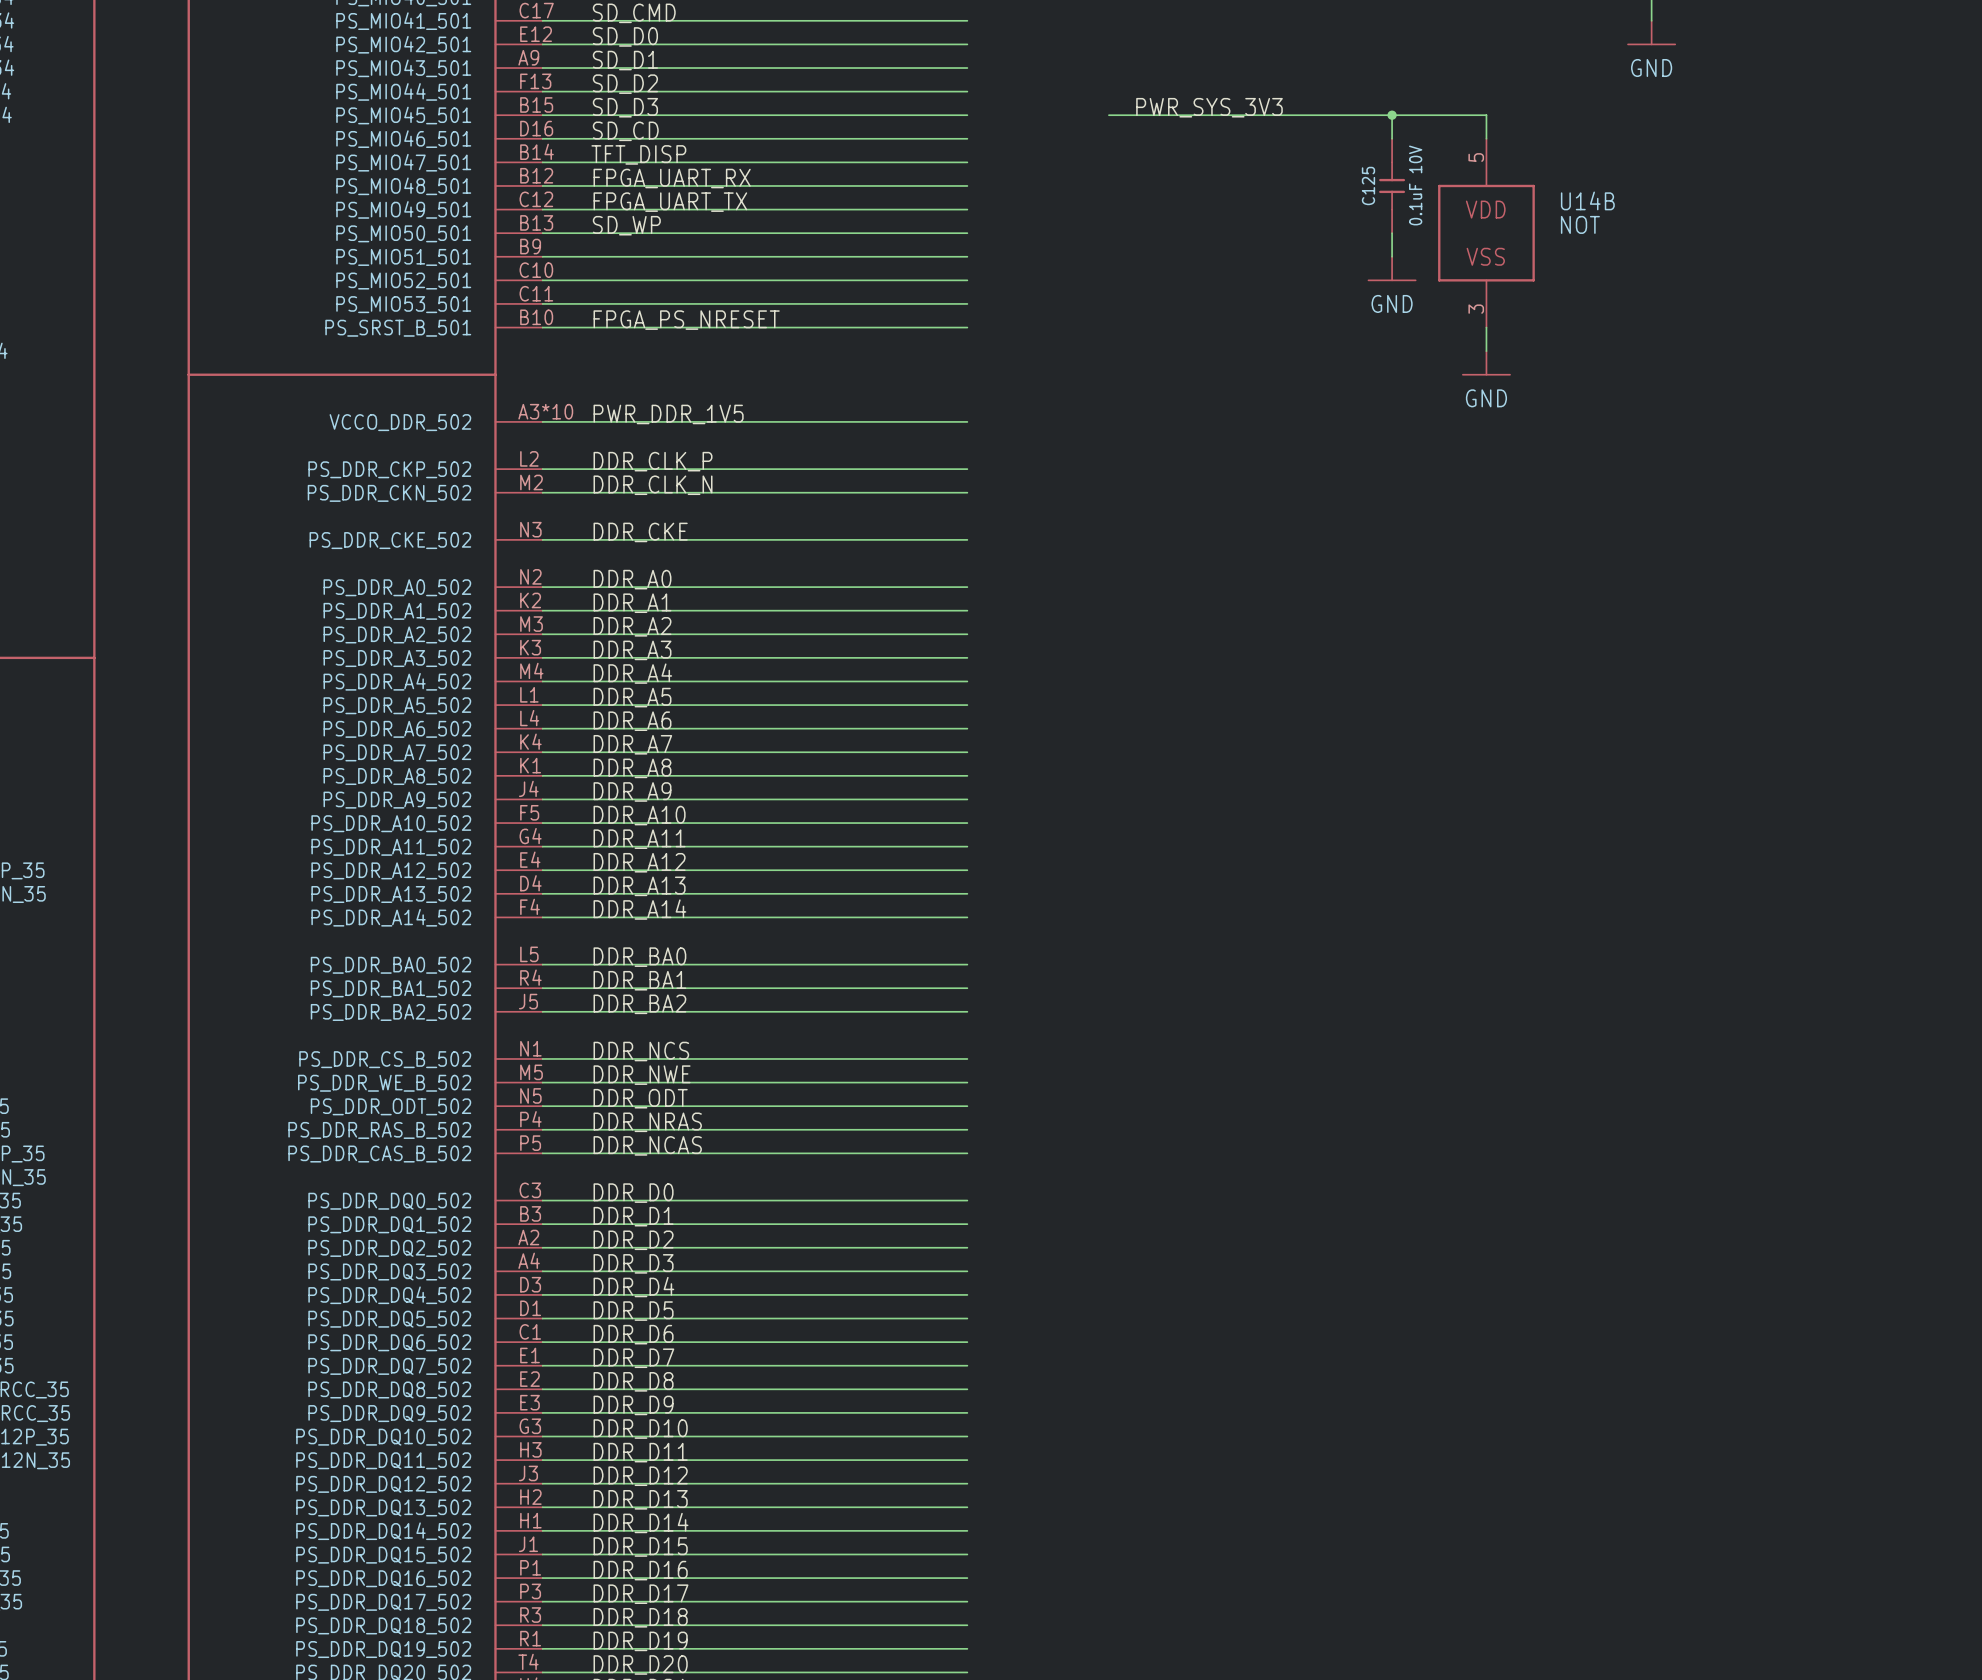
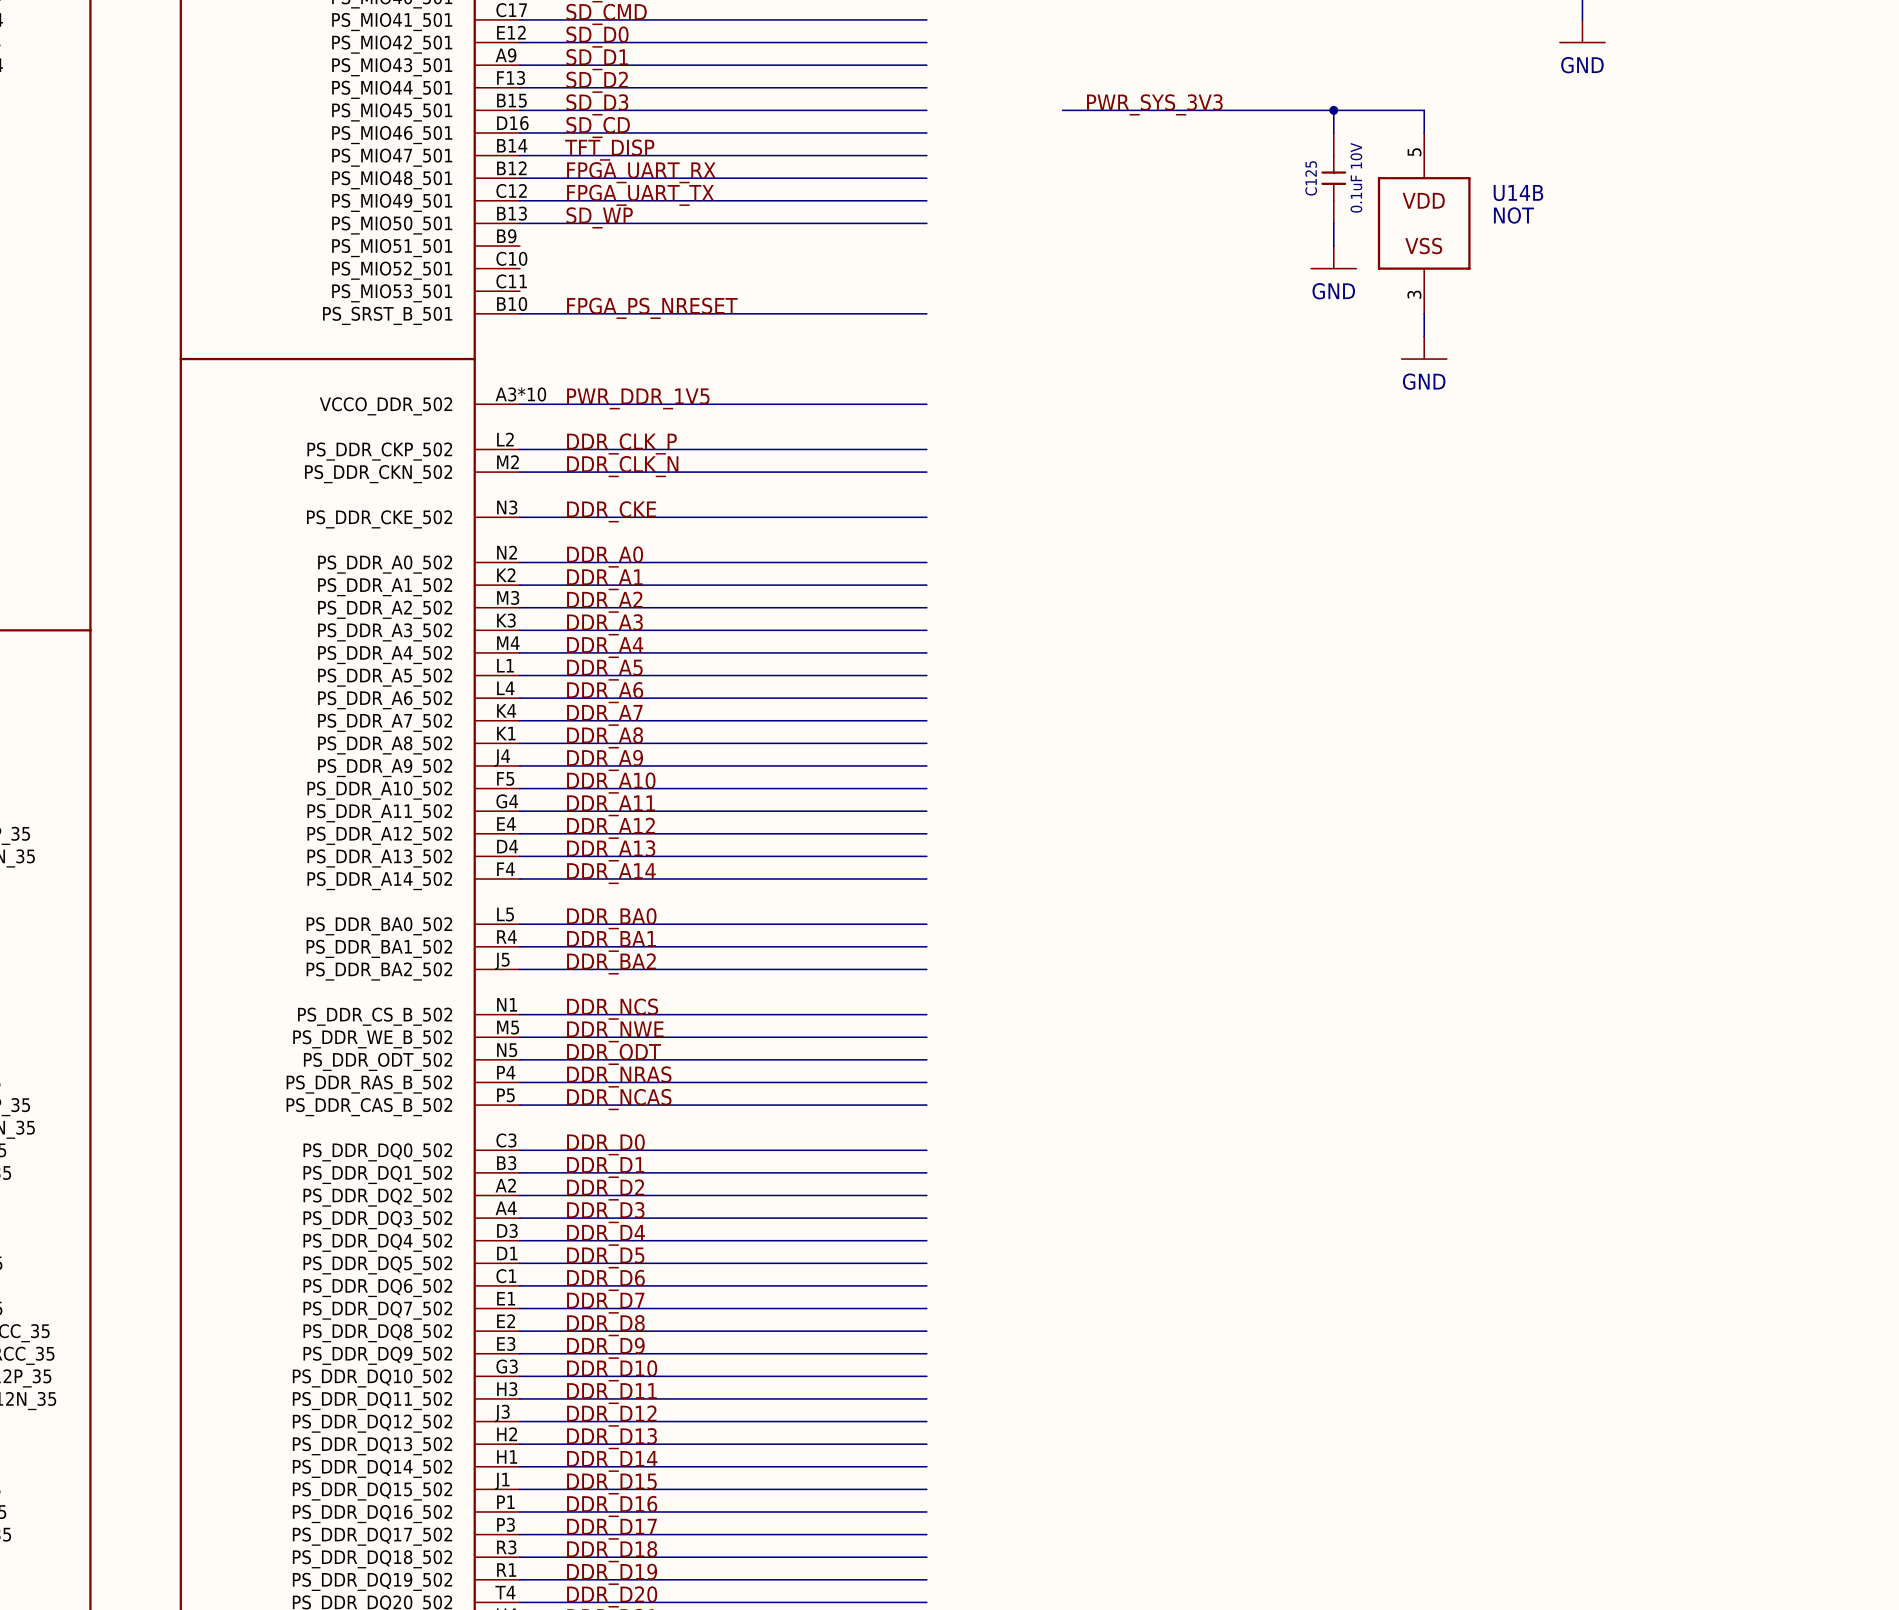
wire: (542, 256) (967, 256) -> none
wire: (542, 280) (967, 280) -> none
wire: (542, 303) (967, 303) -> none

